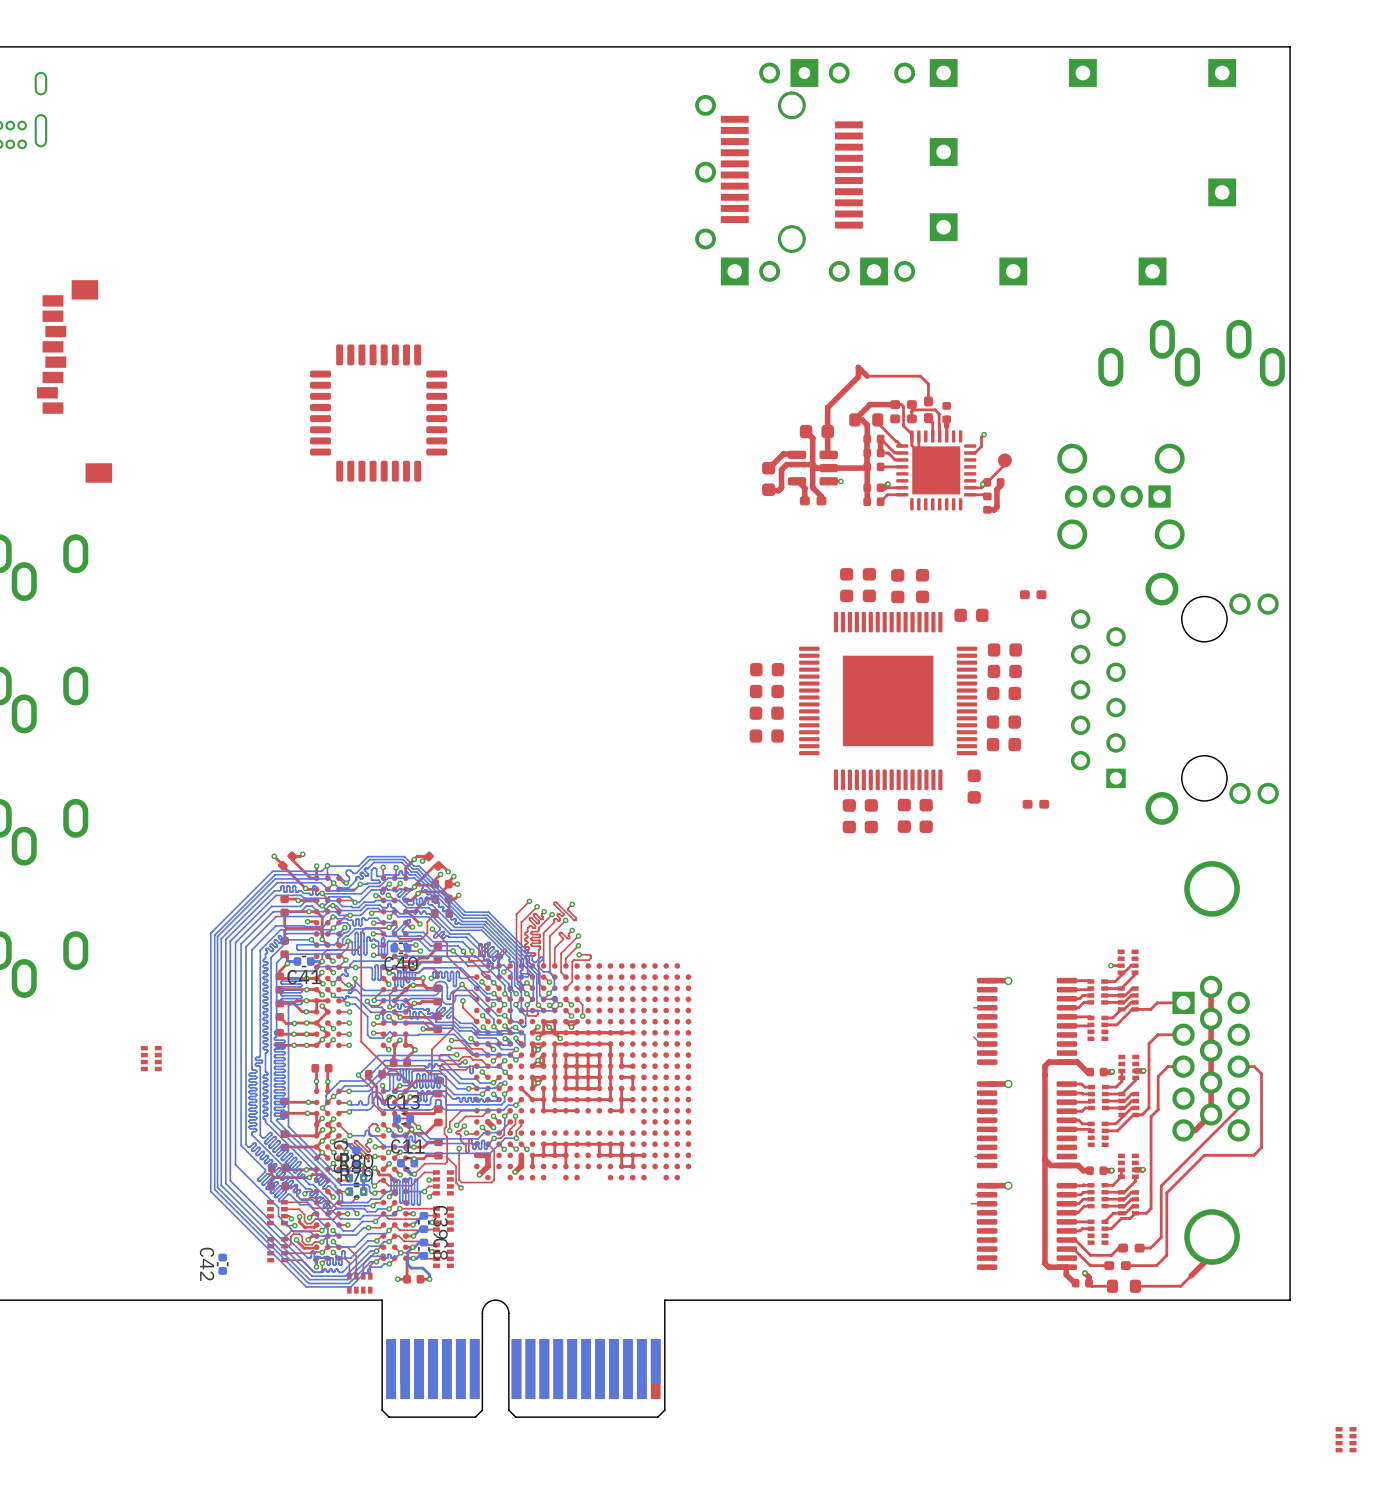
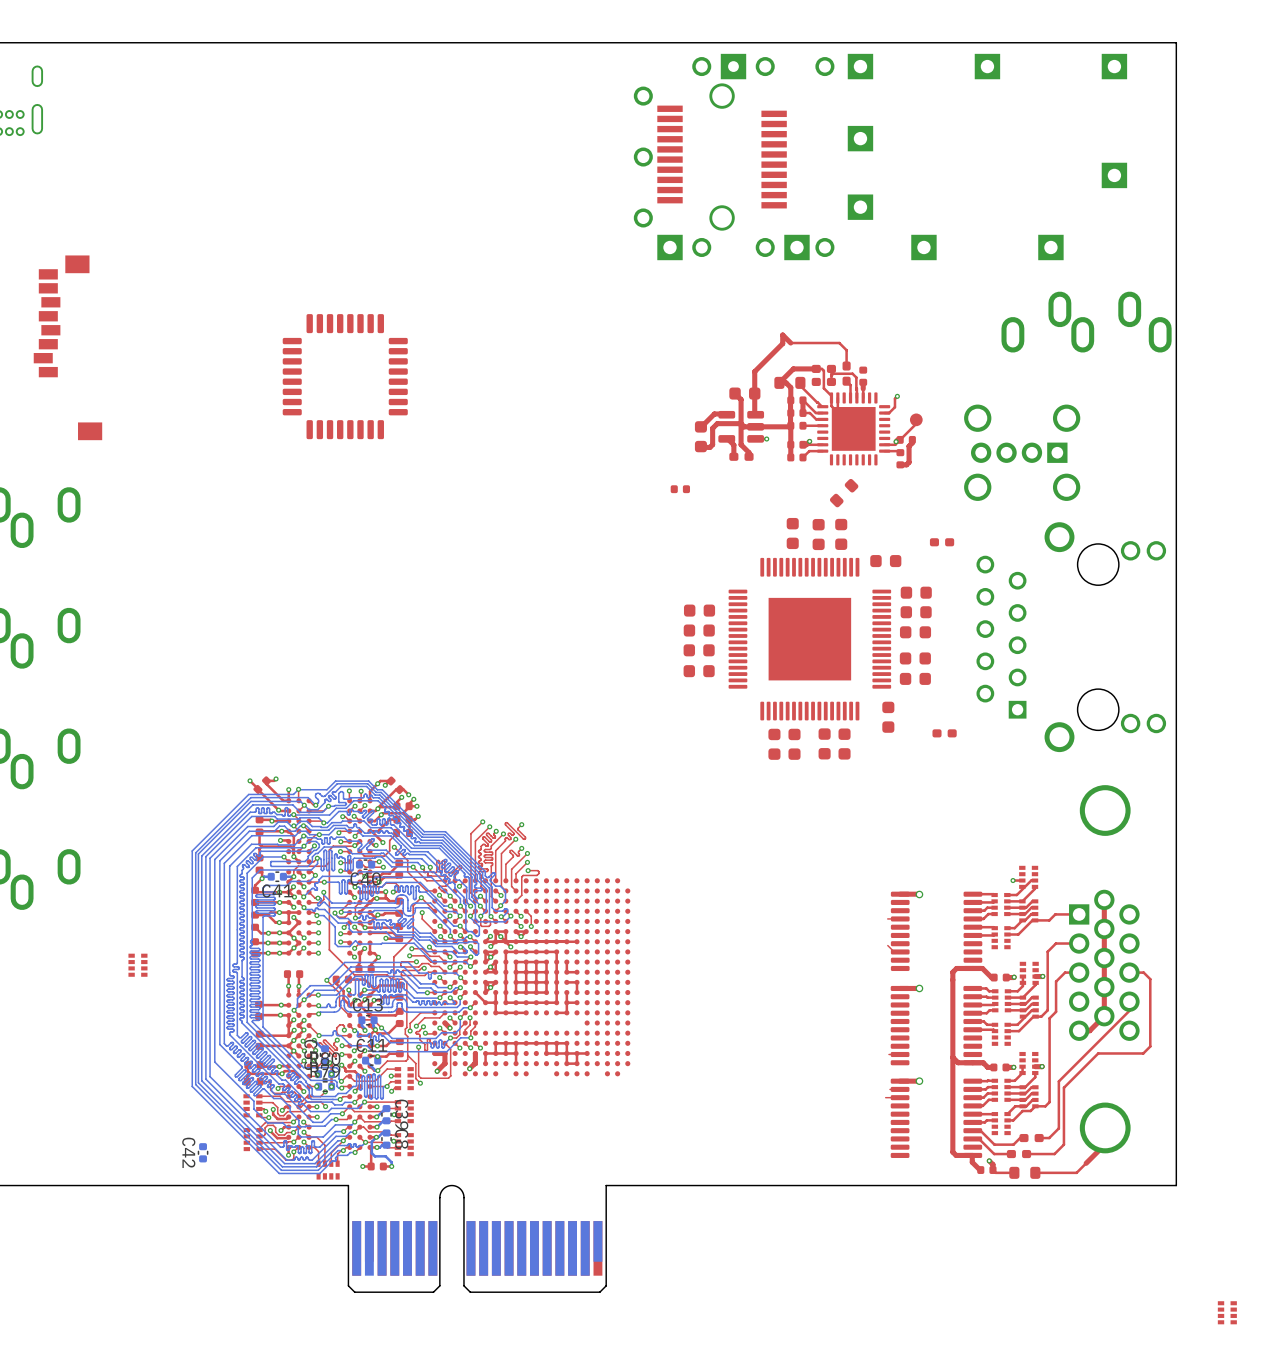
part: none -> (680, 489)
part: none -> (844, 493)
part: (846, 585) -> none

